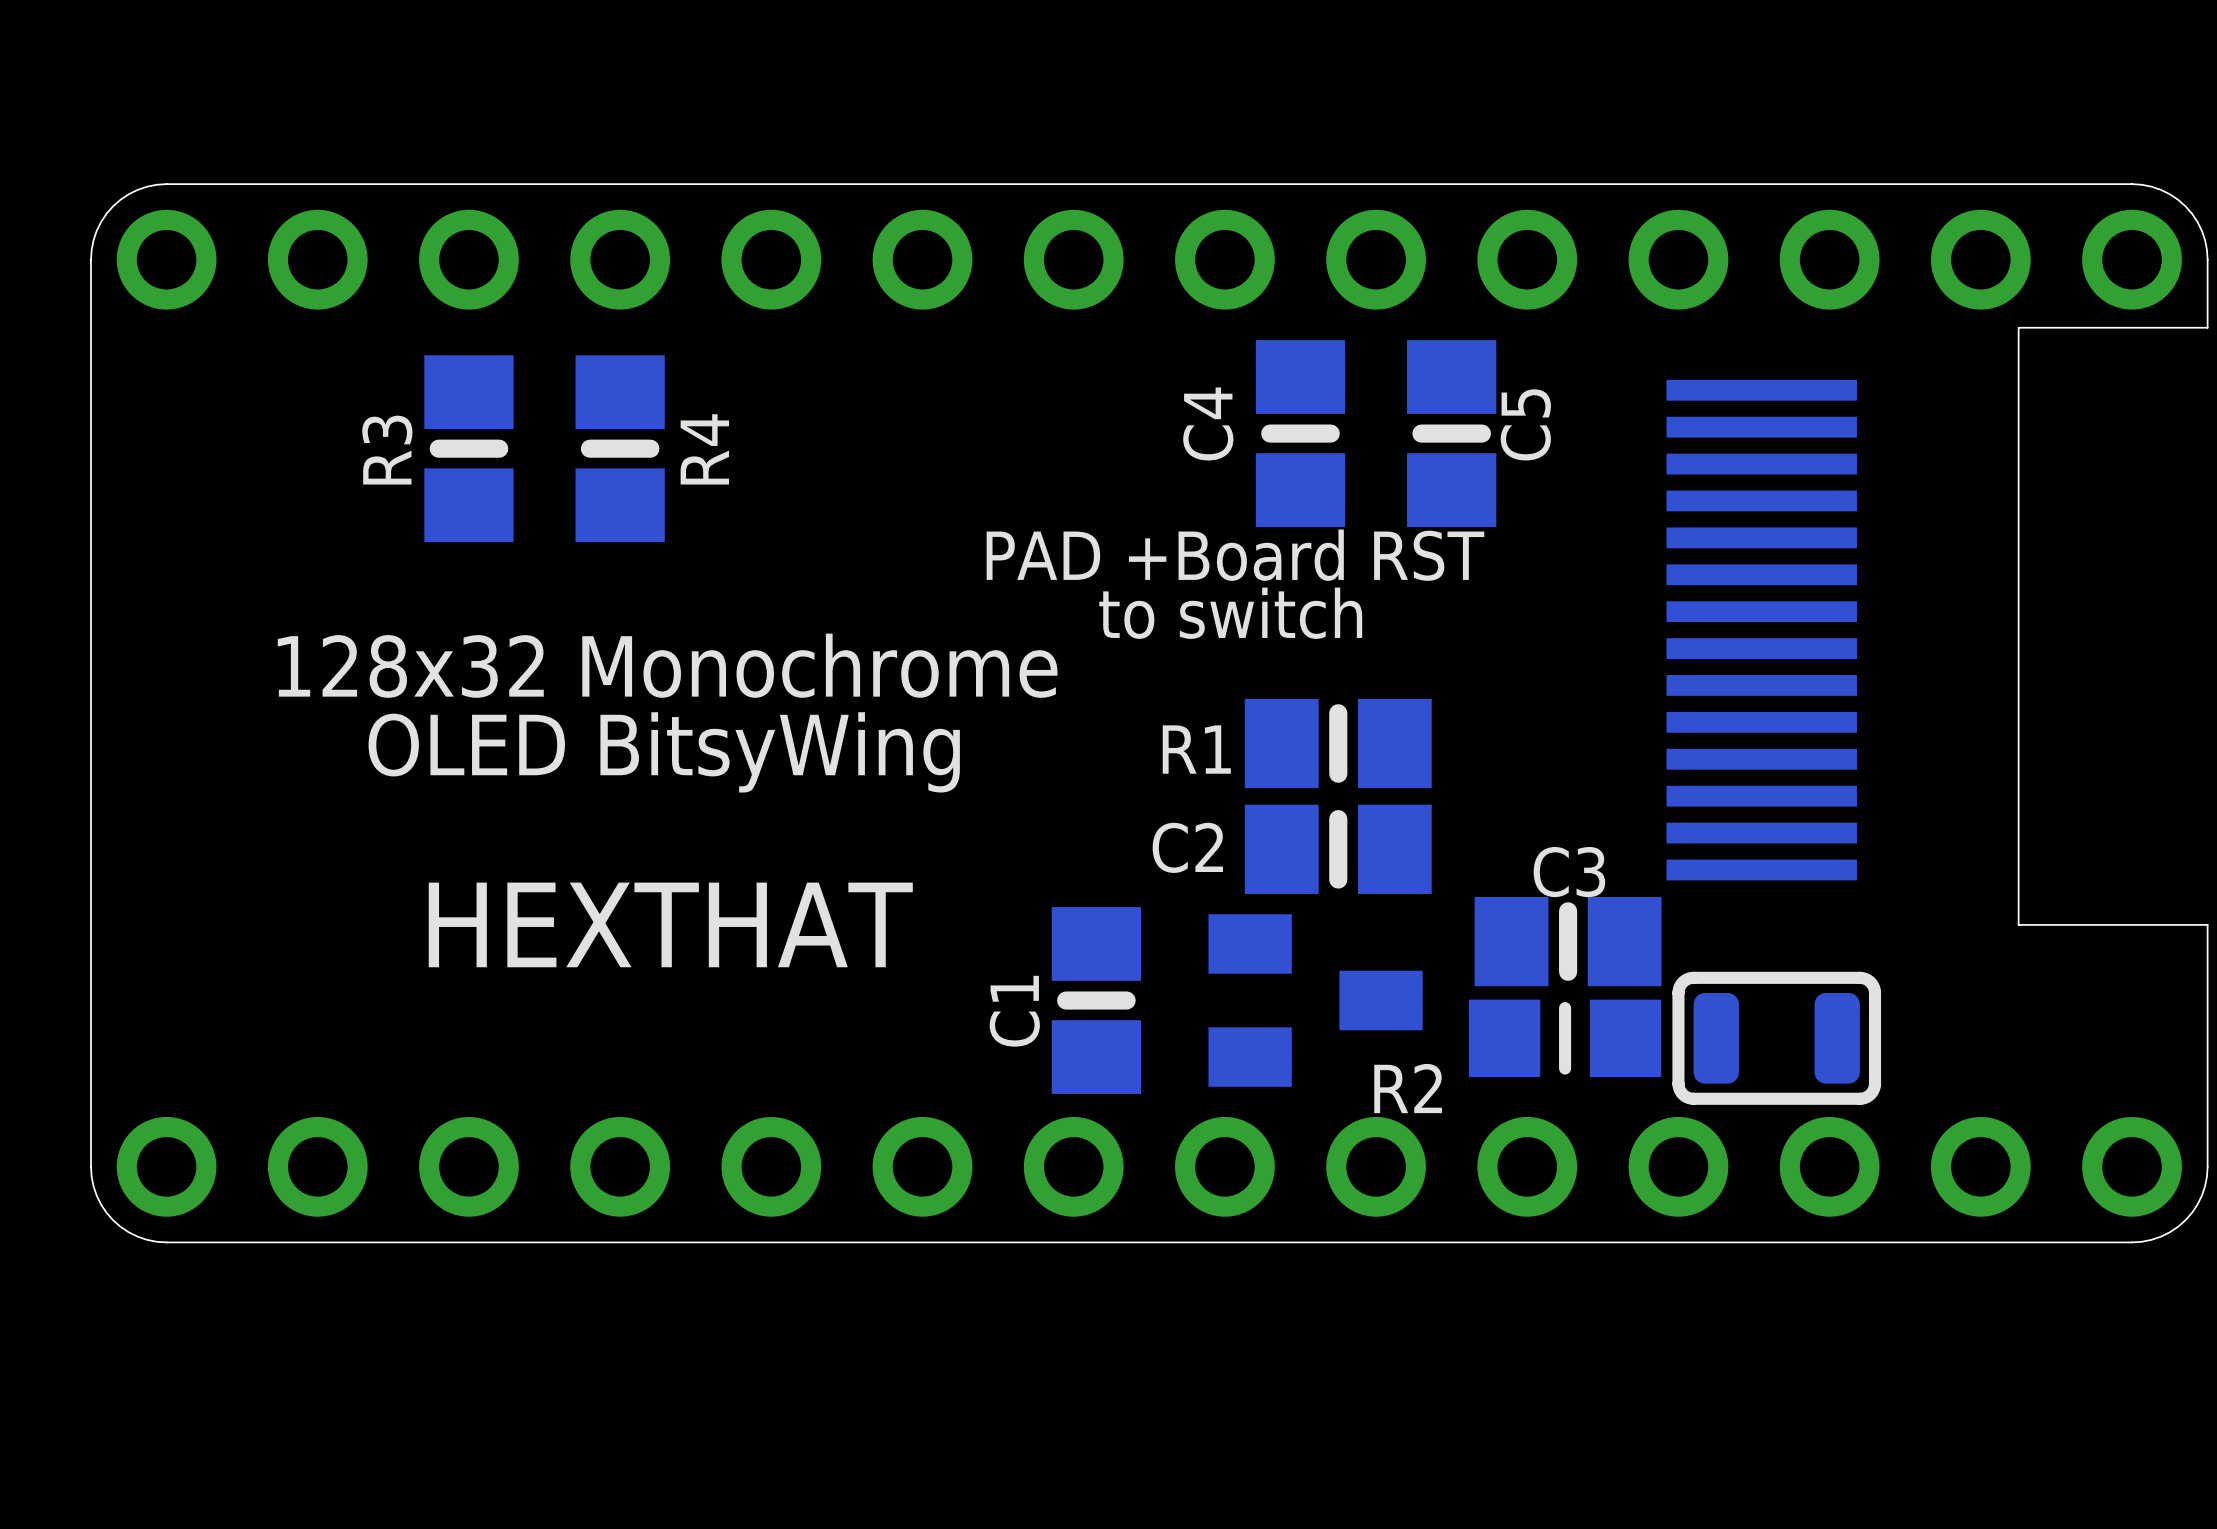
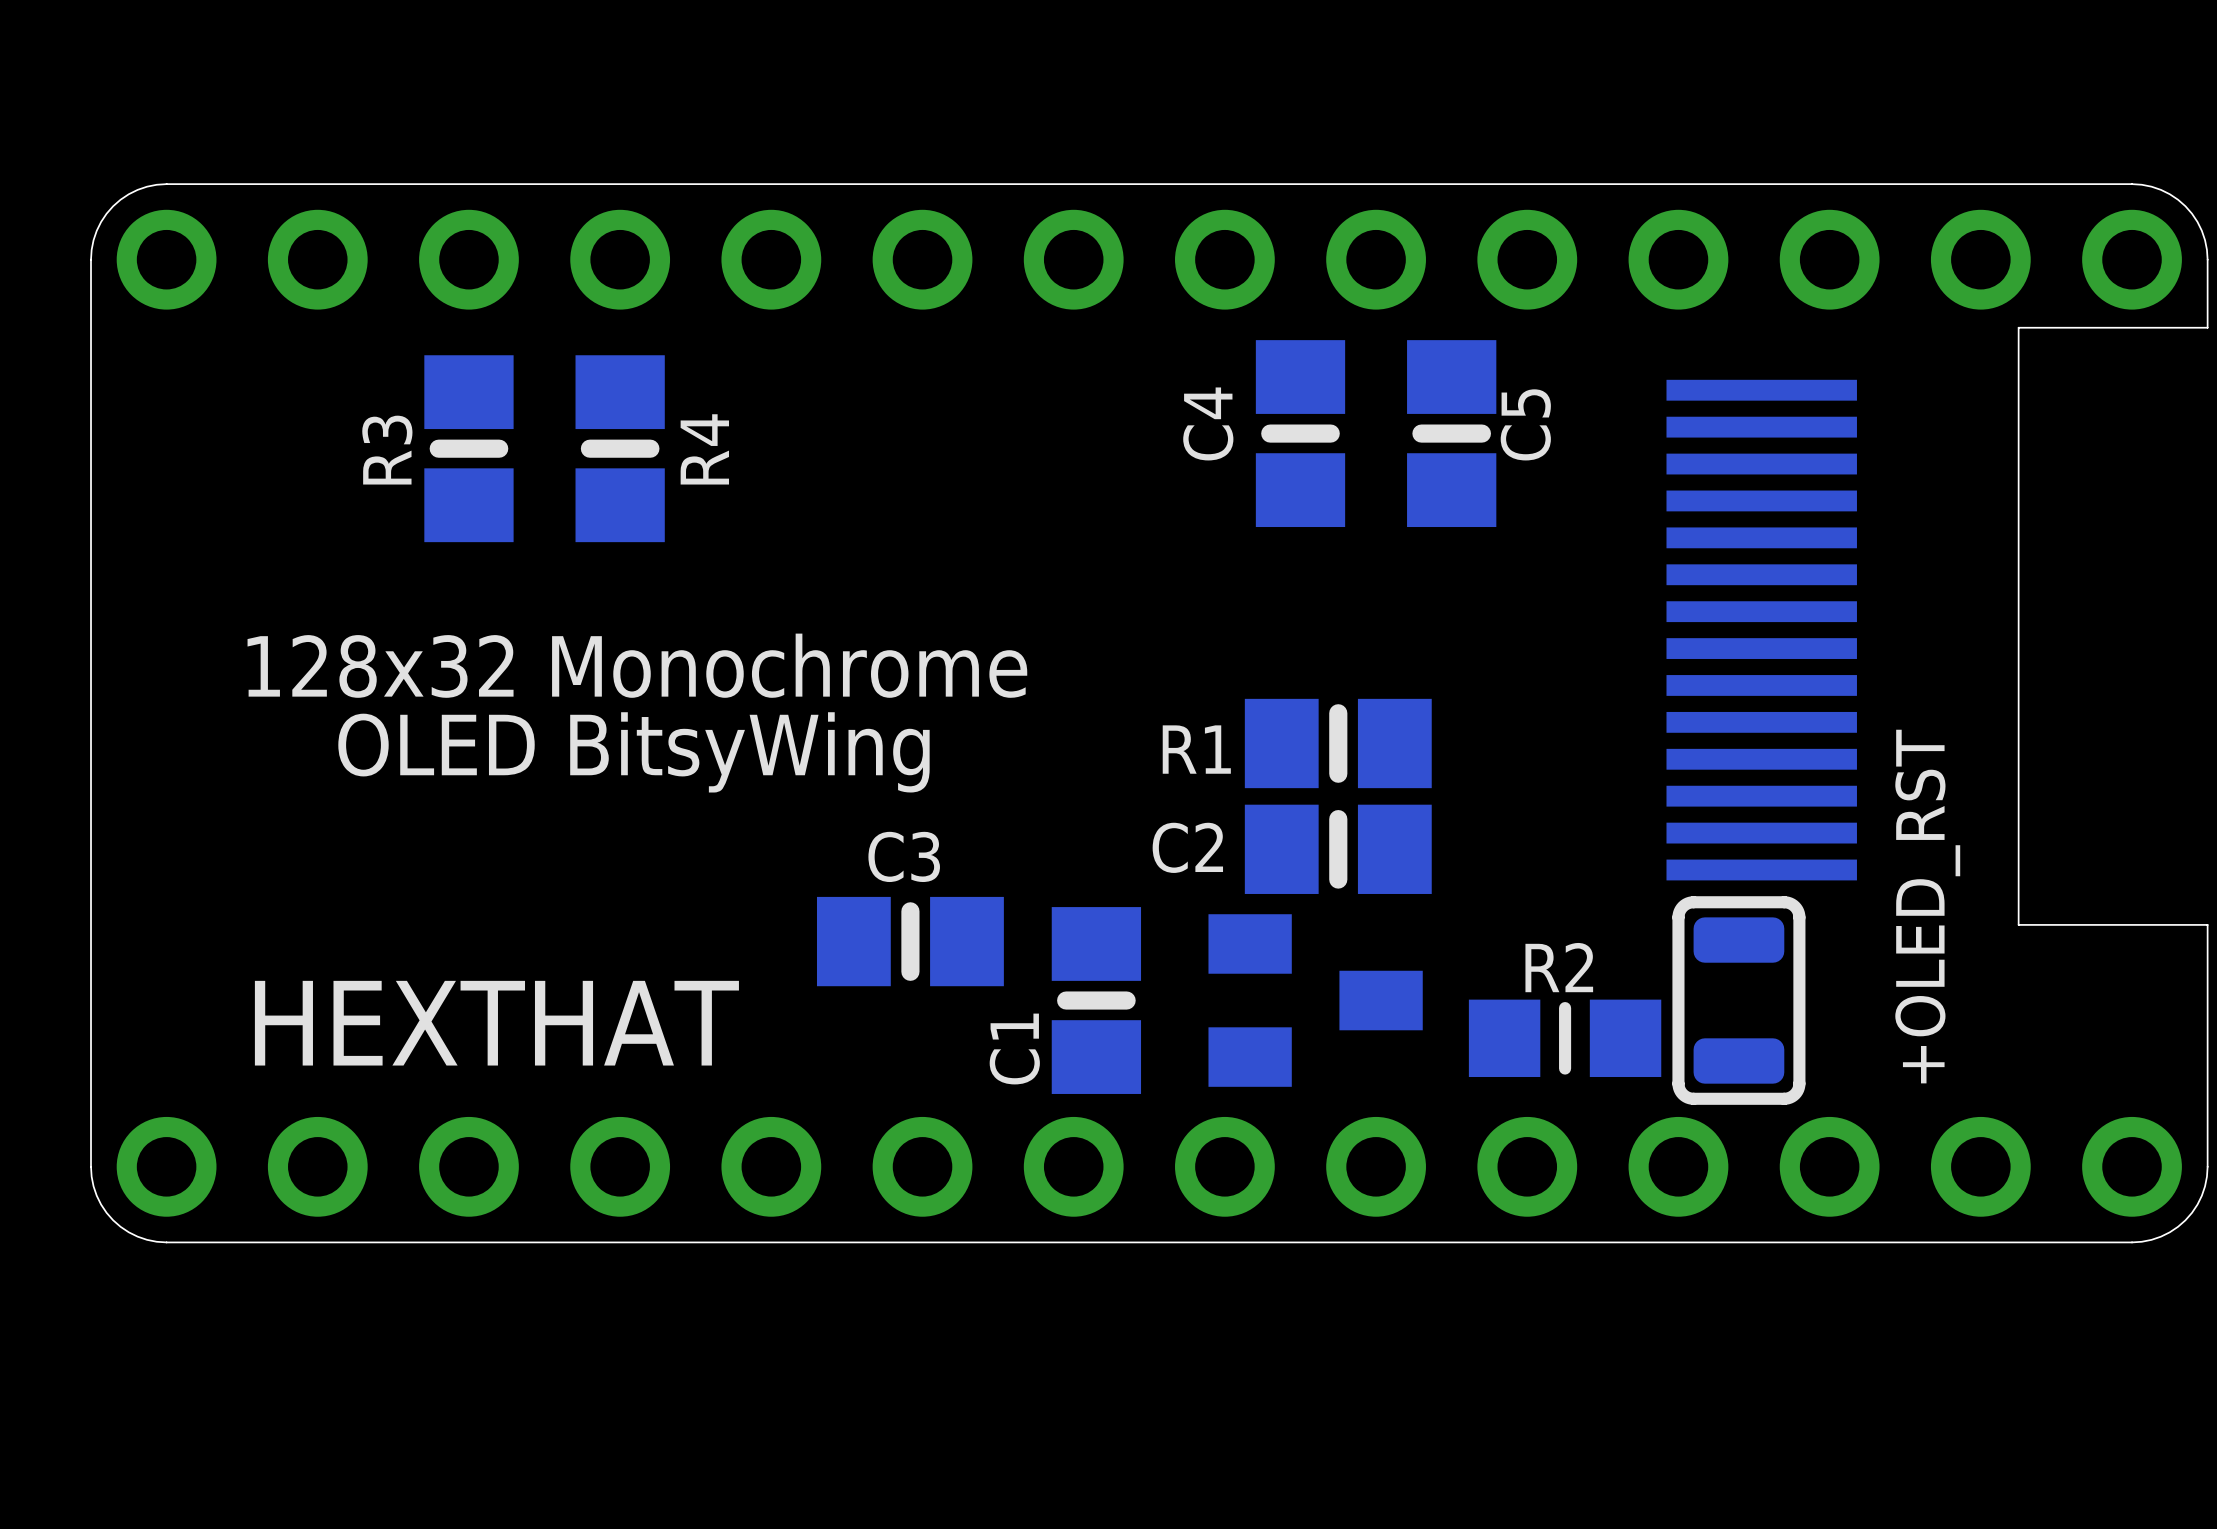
text: PAD +Board RST (1235, 555) -> none
text: to switch (1230, 613) -> none
text position: 128x32 Monochrome (667, 665) -> 128x32 Monochrome (637, 665)
text position: OLED BitsyWing (664, 752) -> OLED BitsyWing (633, 752)
C3 name position: C3 (1569, 872) -> C3 (904, 856)
text: none -> +OLED_RST (1927, 906)
text position: HEXTHAT (670, 924) -> HEXTHAT (496, 1023)
C3 position: (1568, 941) -> (910, 941)
C1 name position: C1 (1014, 1011) -> C1 (1014, 1049)
part rotation: 0° (1776, 1038) -> 90° clockwise (1738, 1000)
R2 name position: R2 (1408, 1088) -> R2 (1559, 967)

